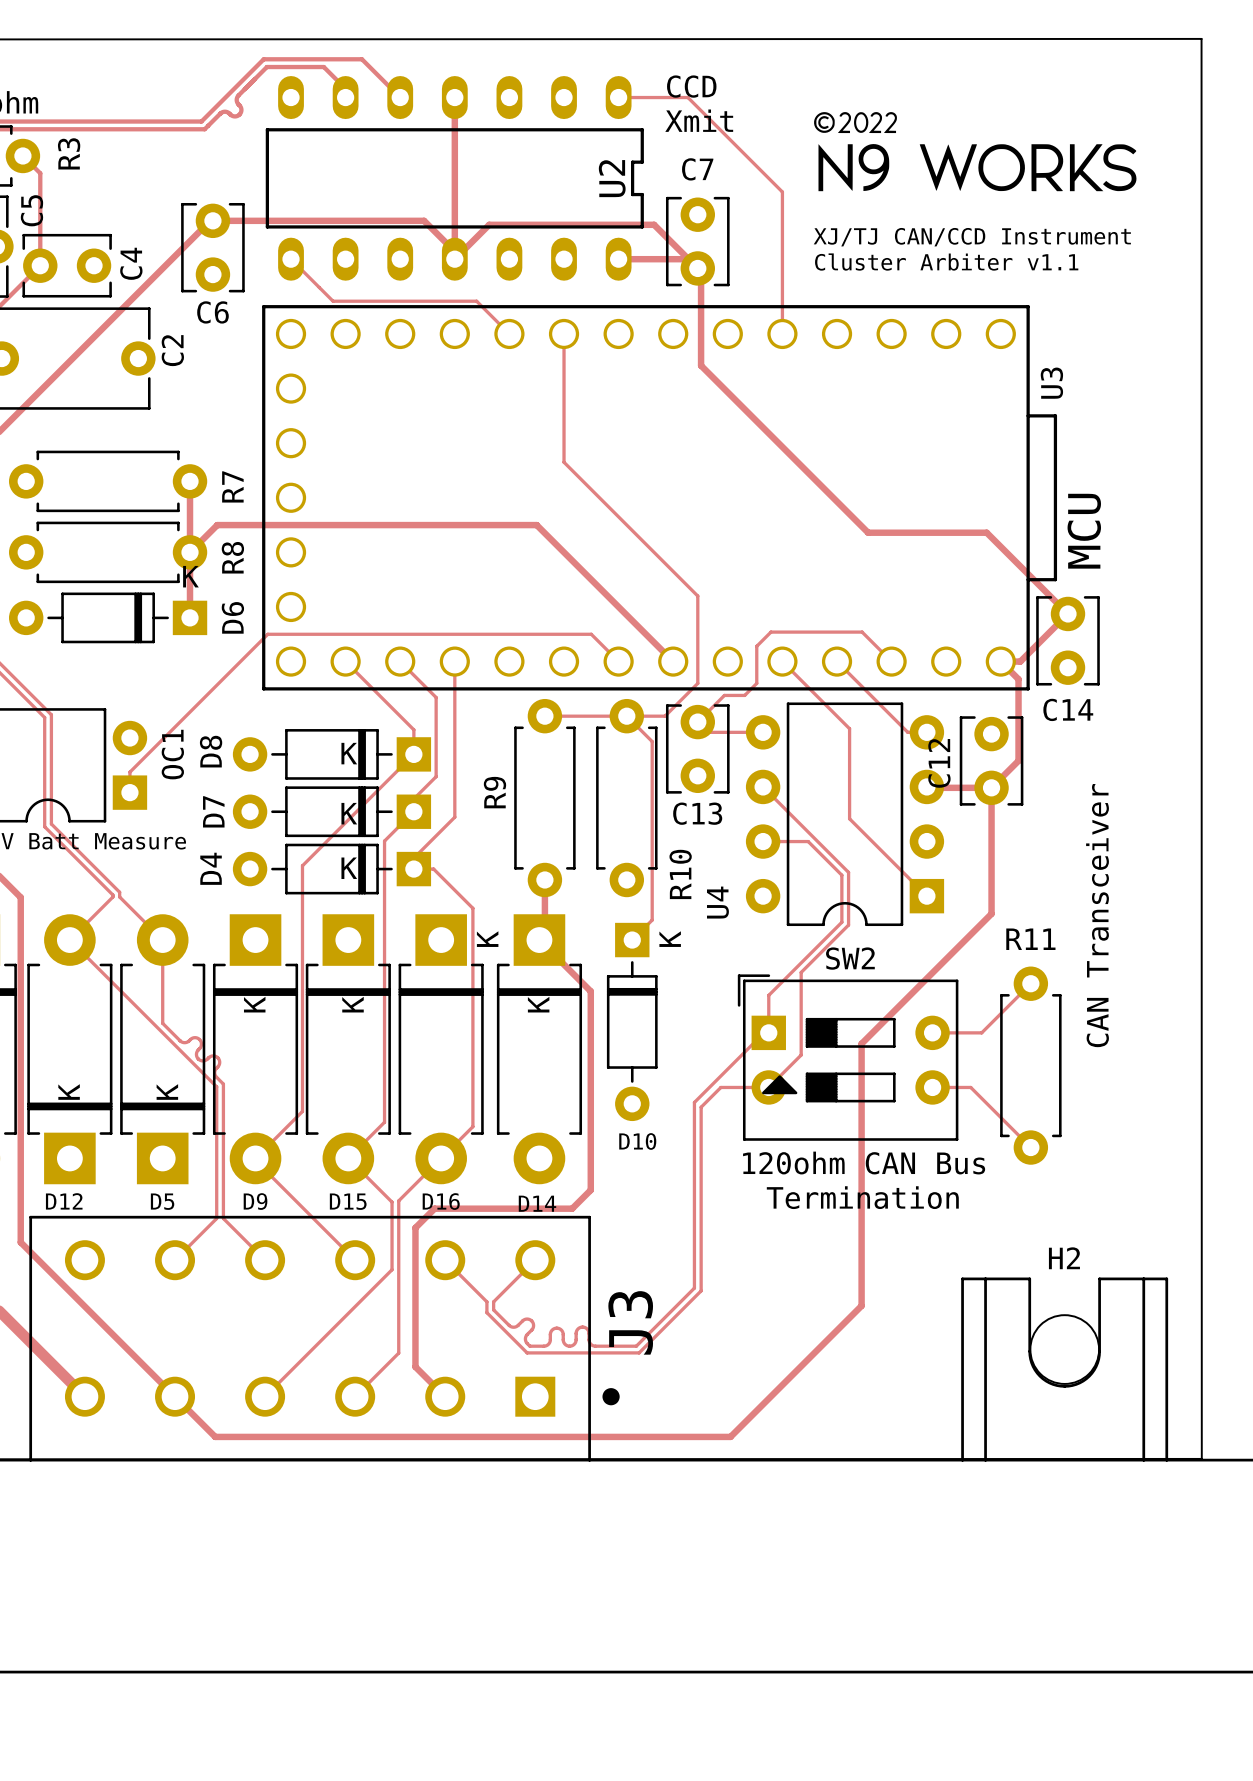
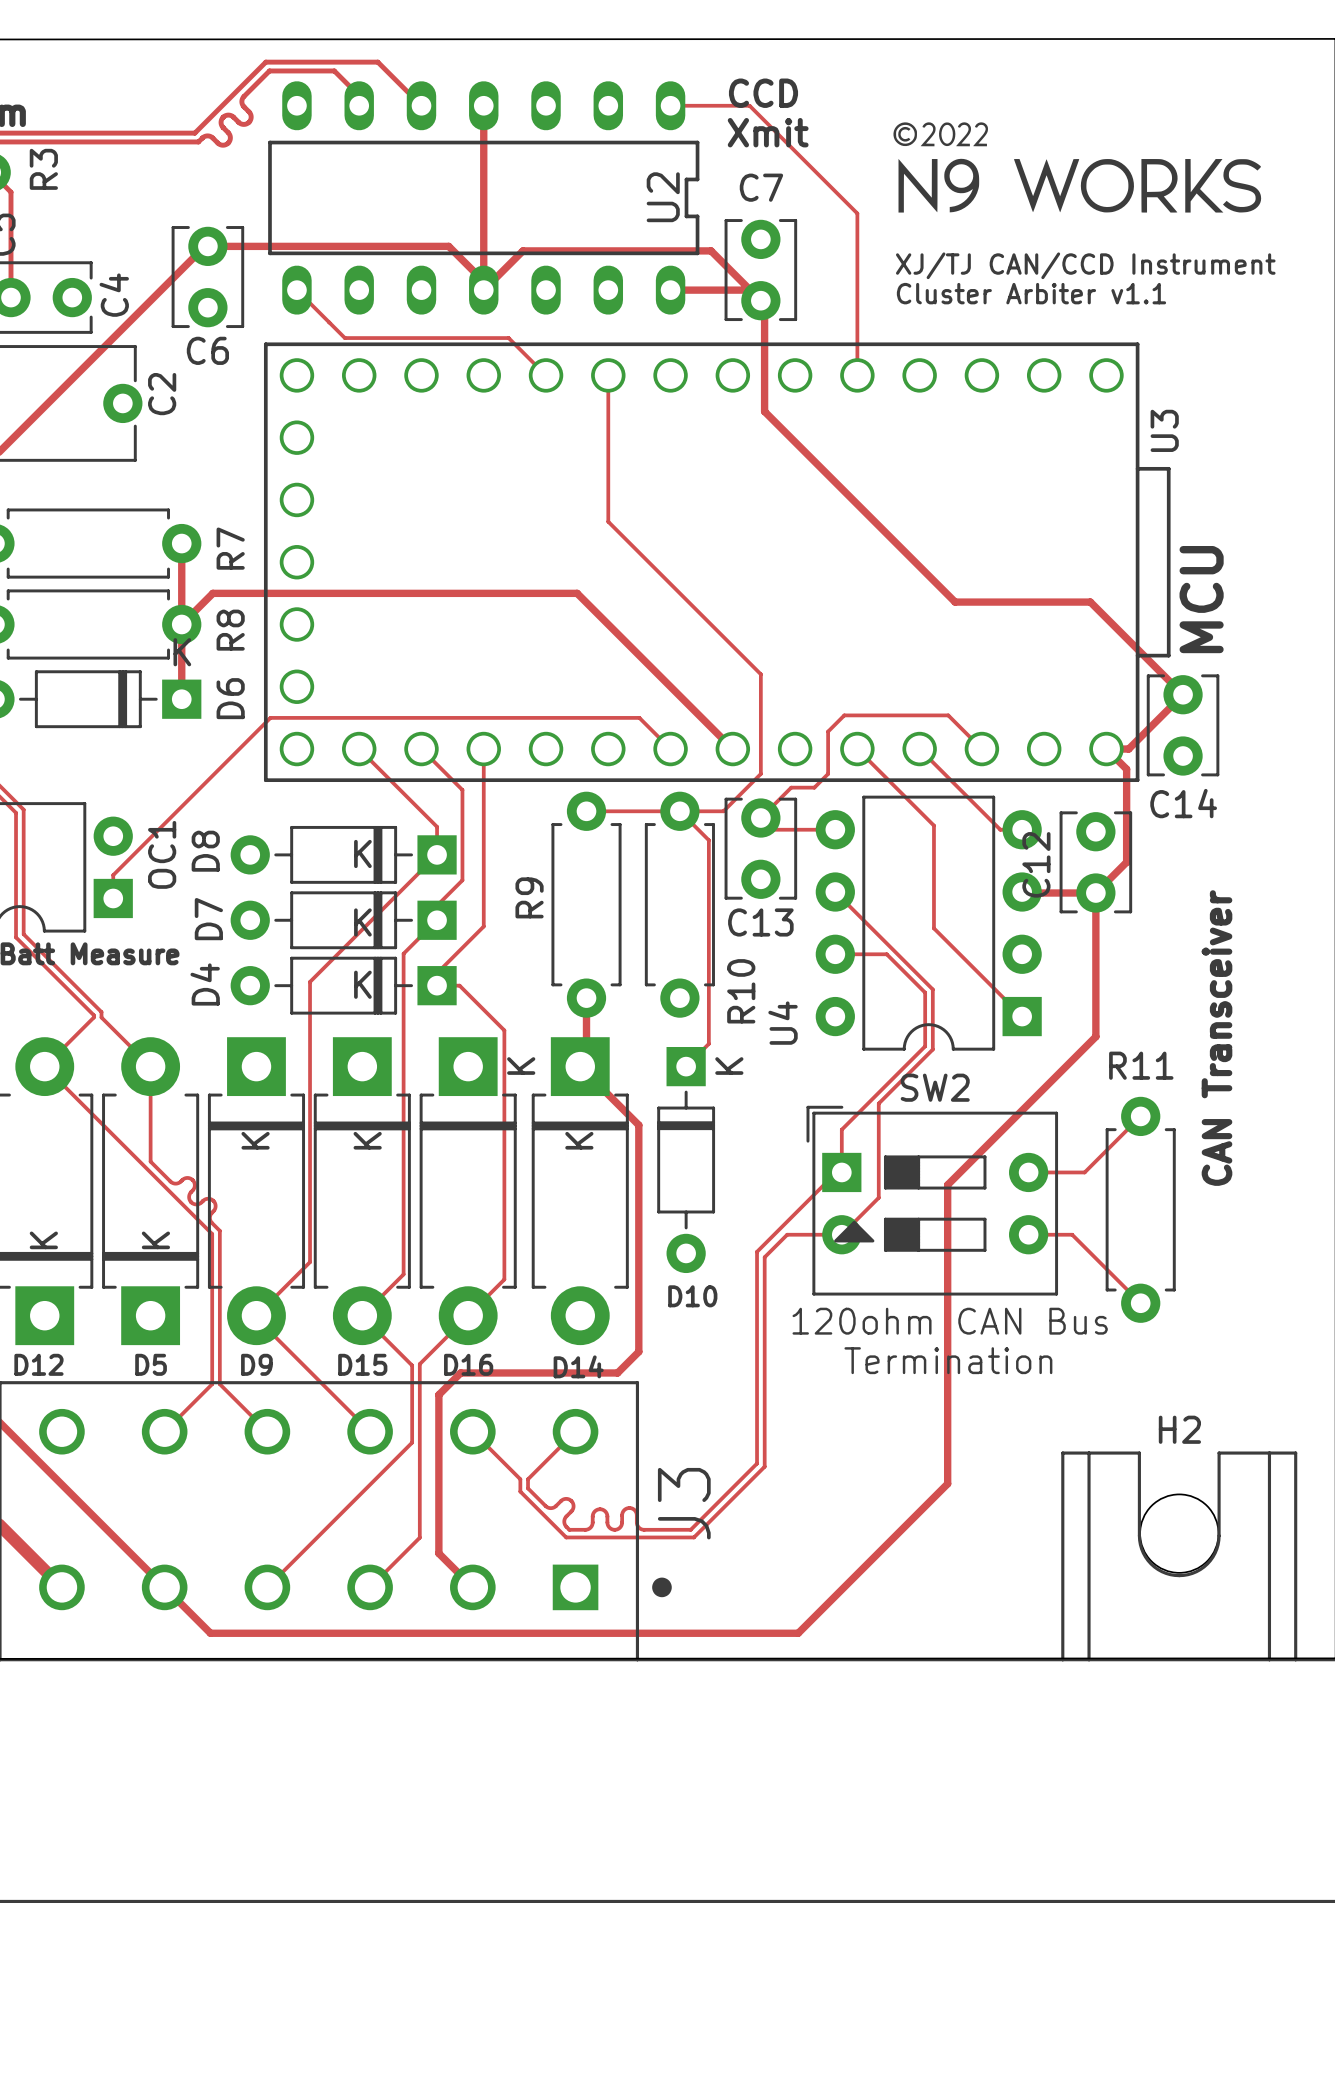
track: (244, 89) (236, 98) (241, 109) (239, 114) (234, 116) (222, 112) (208, 125) -> (244, 96) (242, 103) (250, 114) (249, 122) (242, 124) (230, 115) (223, 117) (221, 124) (230, 137) (229, 141) (225, 144) (219, 144) (210, 136) (202, 138)

